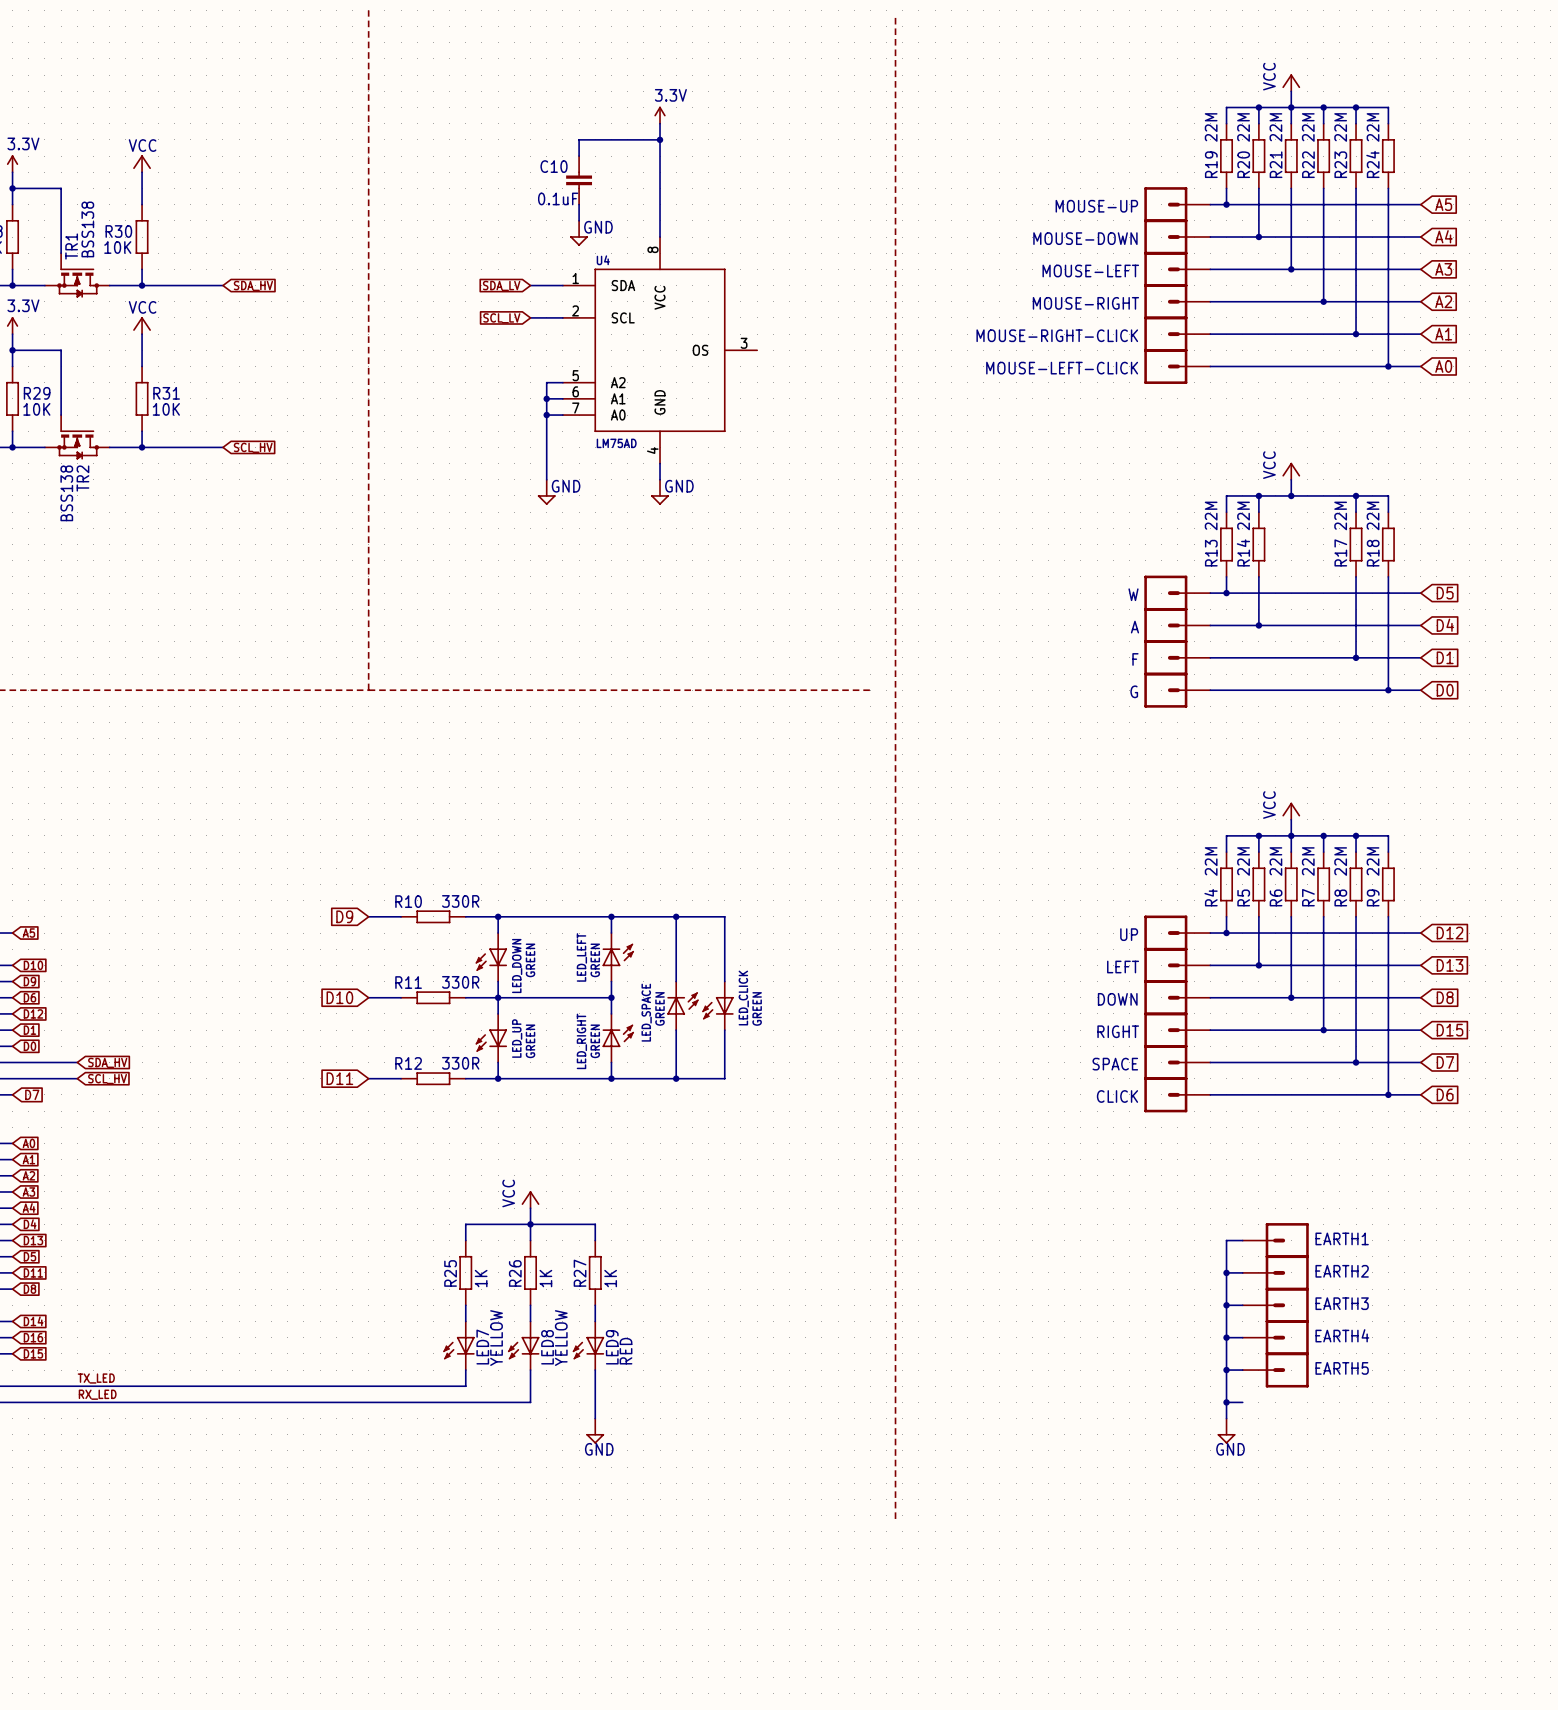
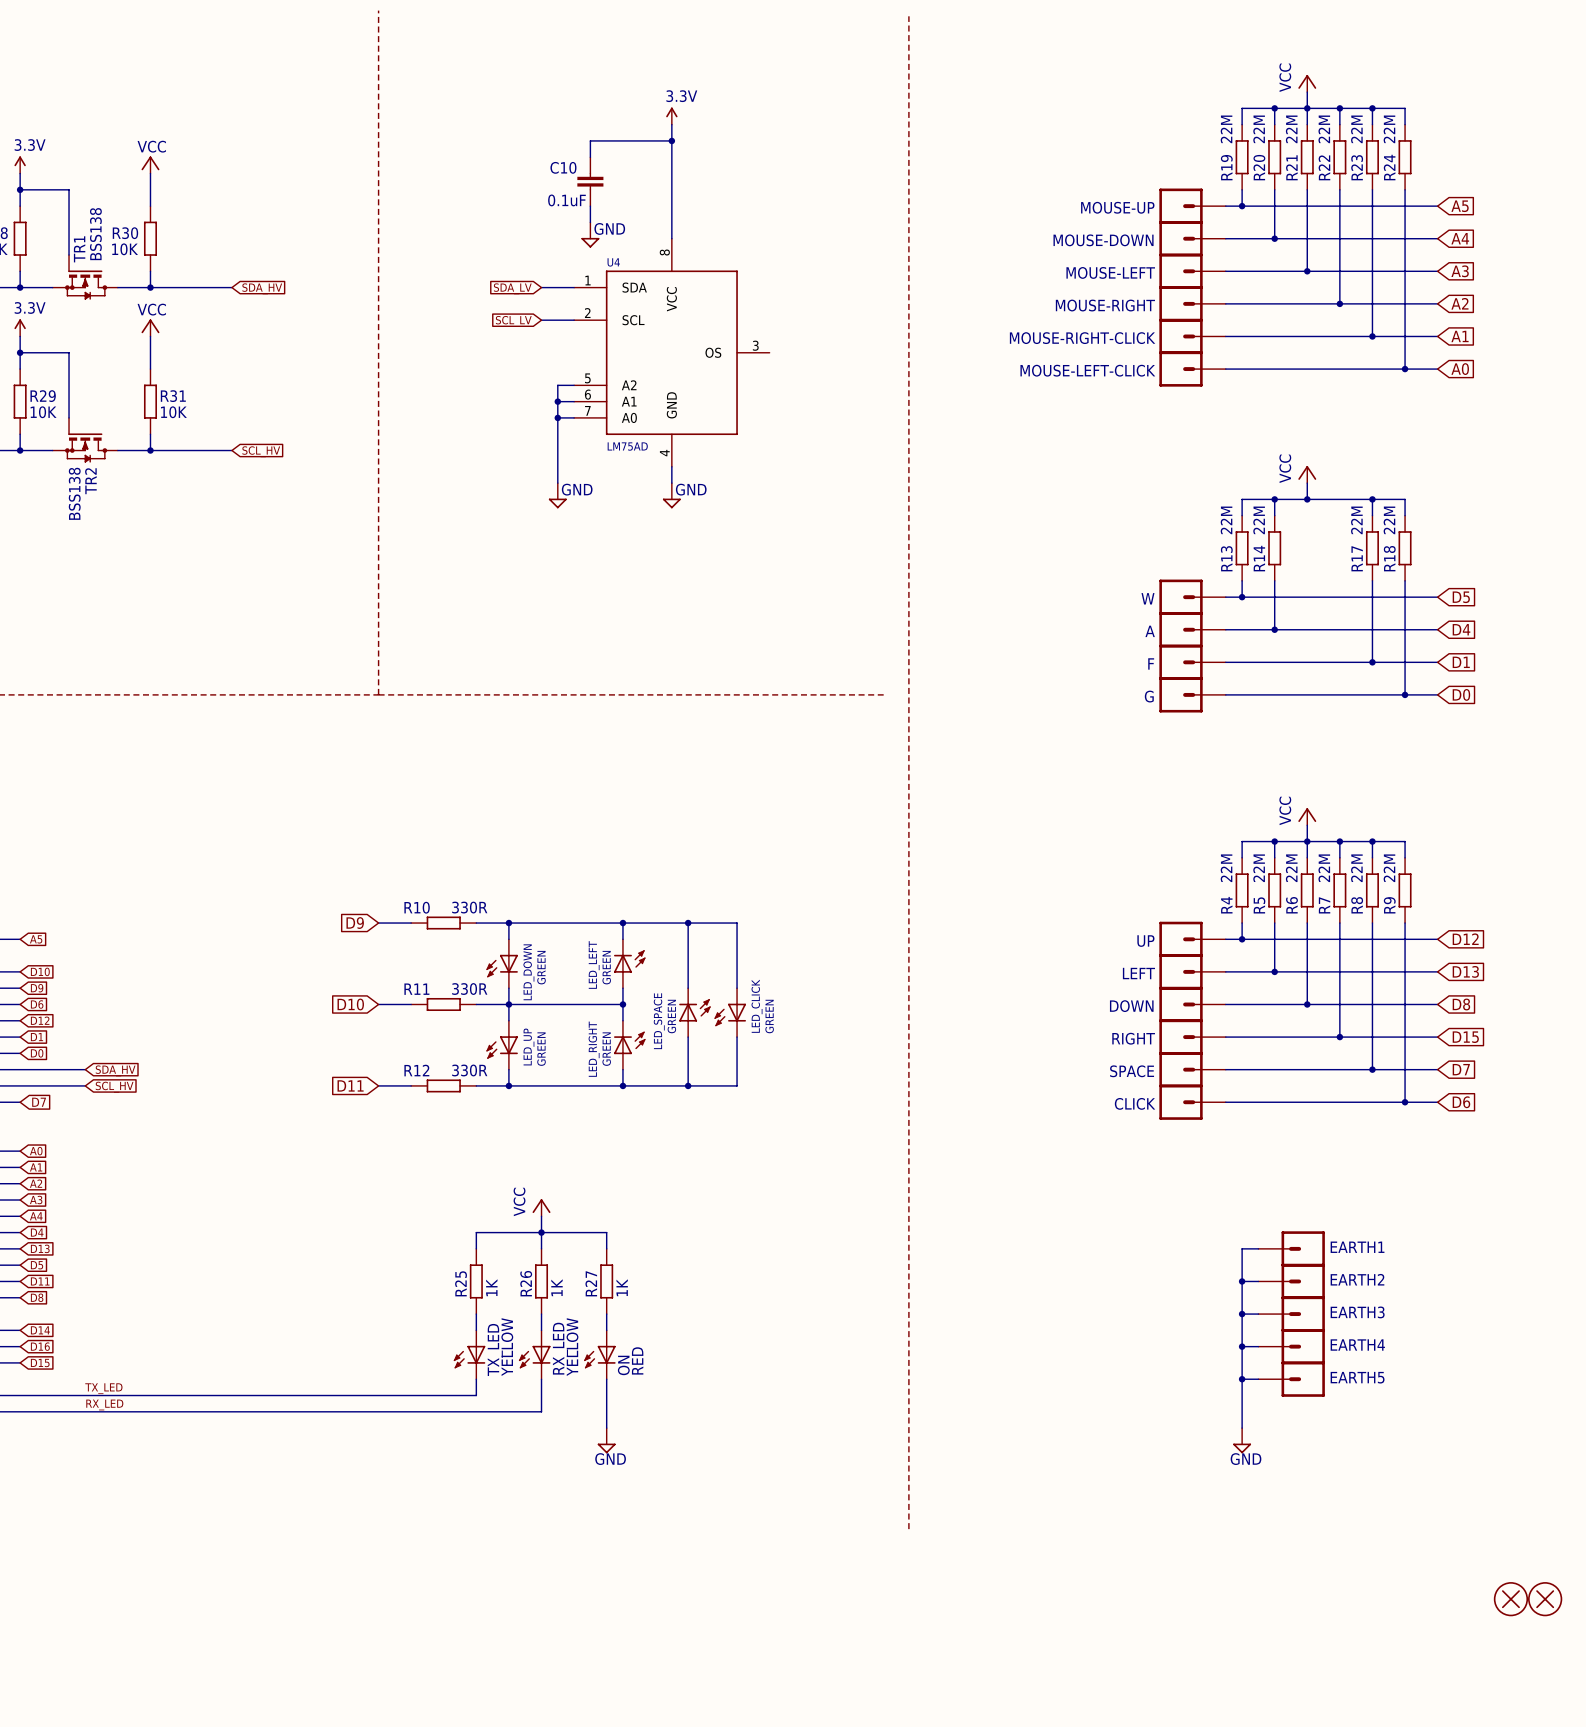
LED7 name: LED7 (482, 1347) -> TX_LED (495, 1349)
LED8 name: LED8 (547, 1347) -> RX_LED (560, 1348)
LED9 name: LED9 (612, 1347) -> ON (623, 1365)
wire: (1226, 1402) (1242, 1402) -> none
junction: (1226, 1402) -> none
part: none -> (1510, 1599)
part: none -> (1545, 1599)

